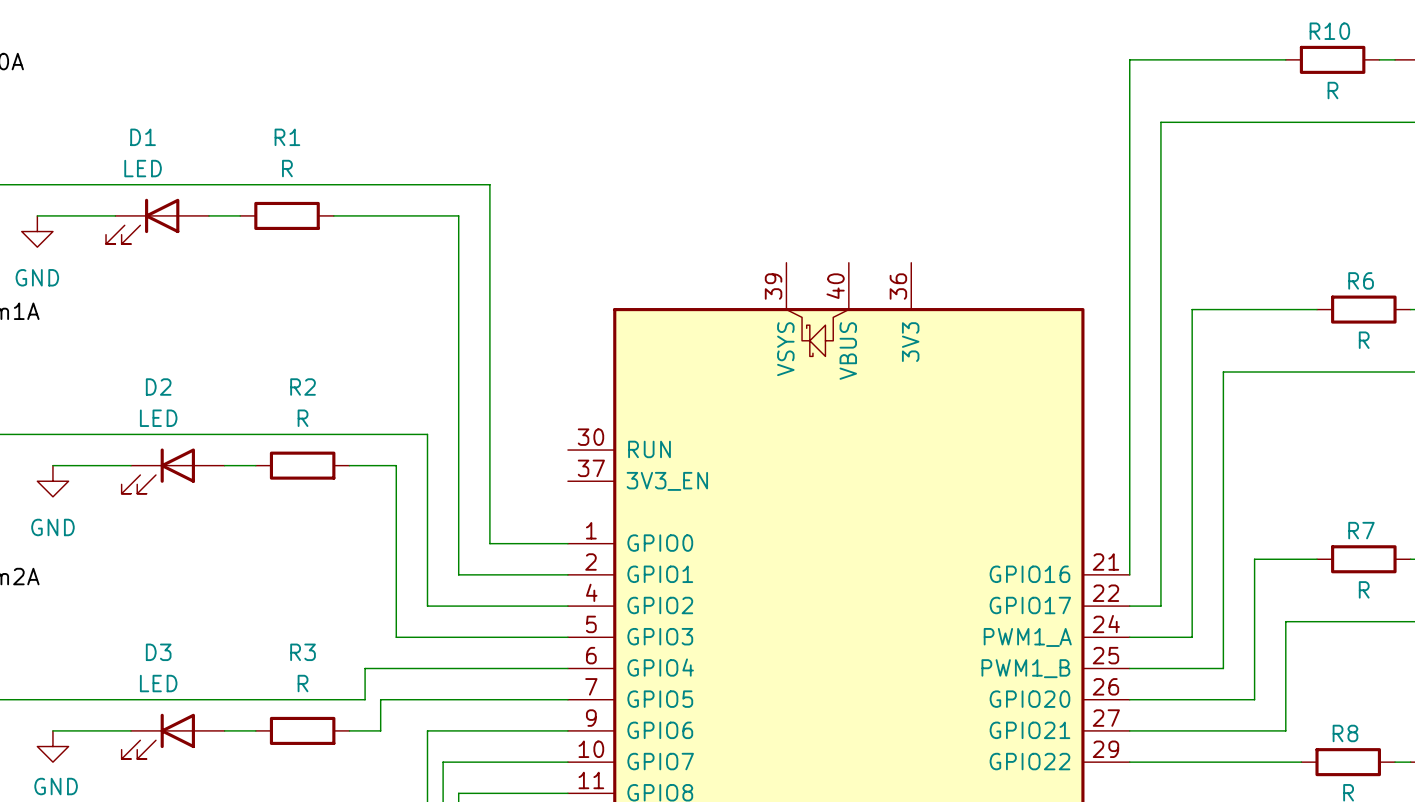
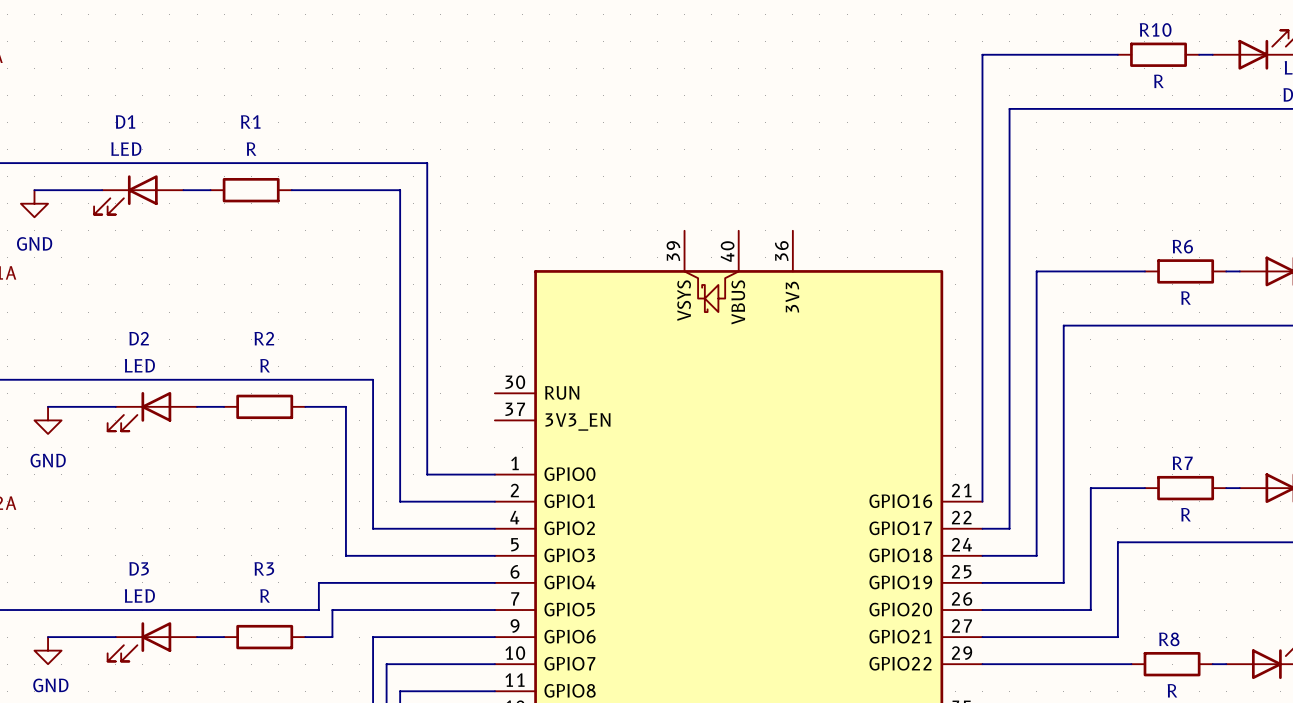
part pin name: PWM1_A (1027, 637) -> GPIO18 (900, 555)
part pin name: PWM1_B (1025, 668) -> GPIO19 (900, 582)

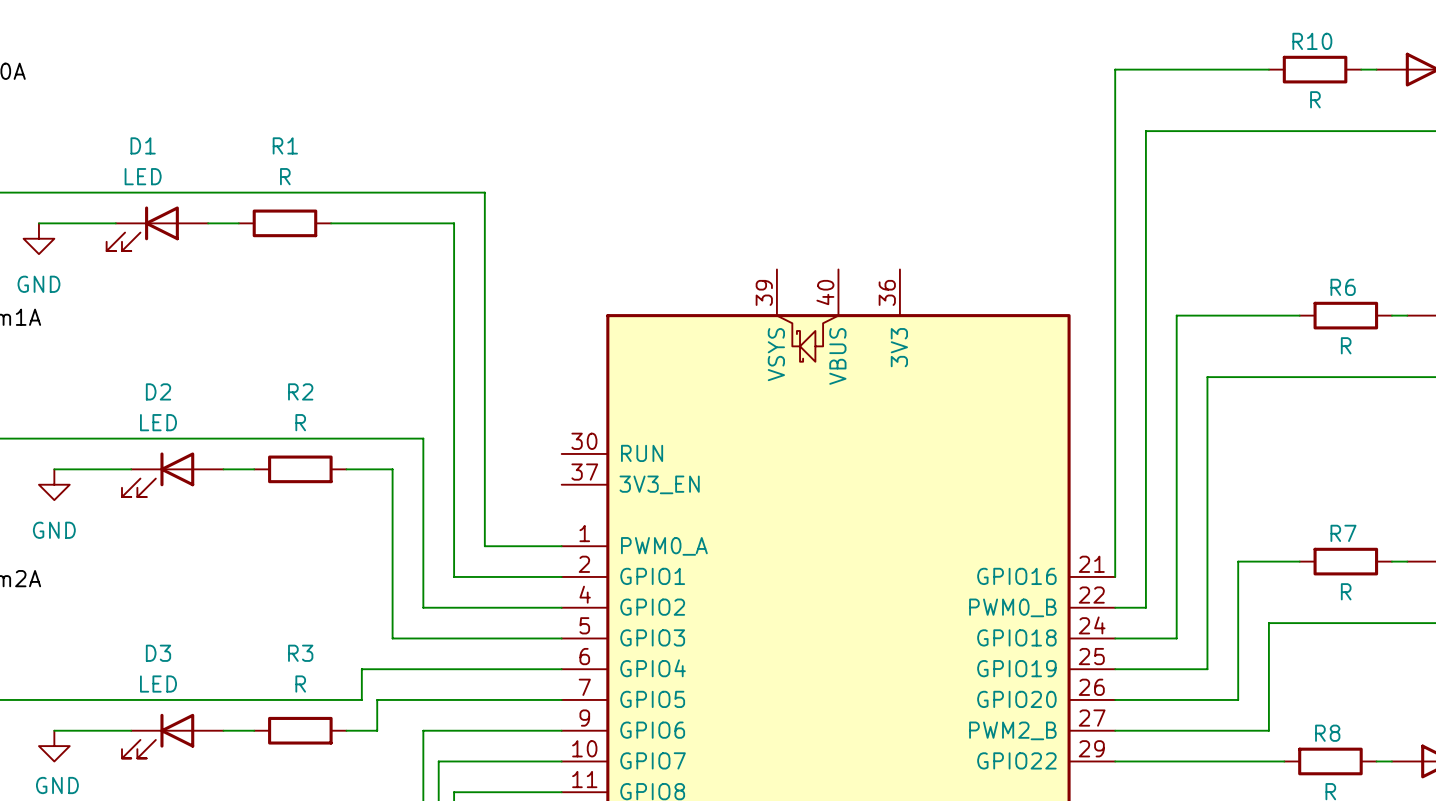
part pin name: GPIO0 (569, 474) -> PWM0_A (664, 546)
part pin name: GPIO17 (900, 528) -> PWM0_B (1012, 607)
part pin name: GPIO21 (900, 636) -> PWM2_B (1012, 730)

